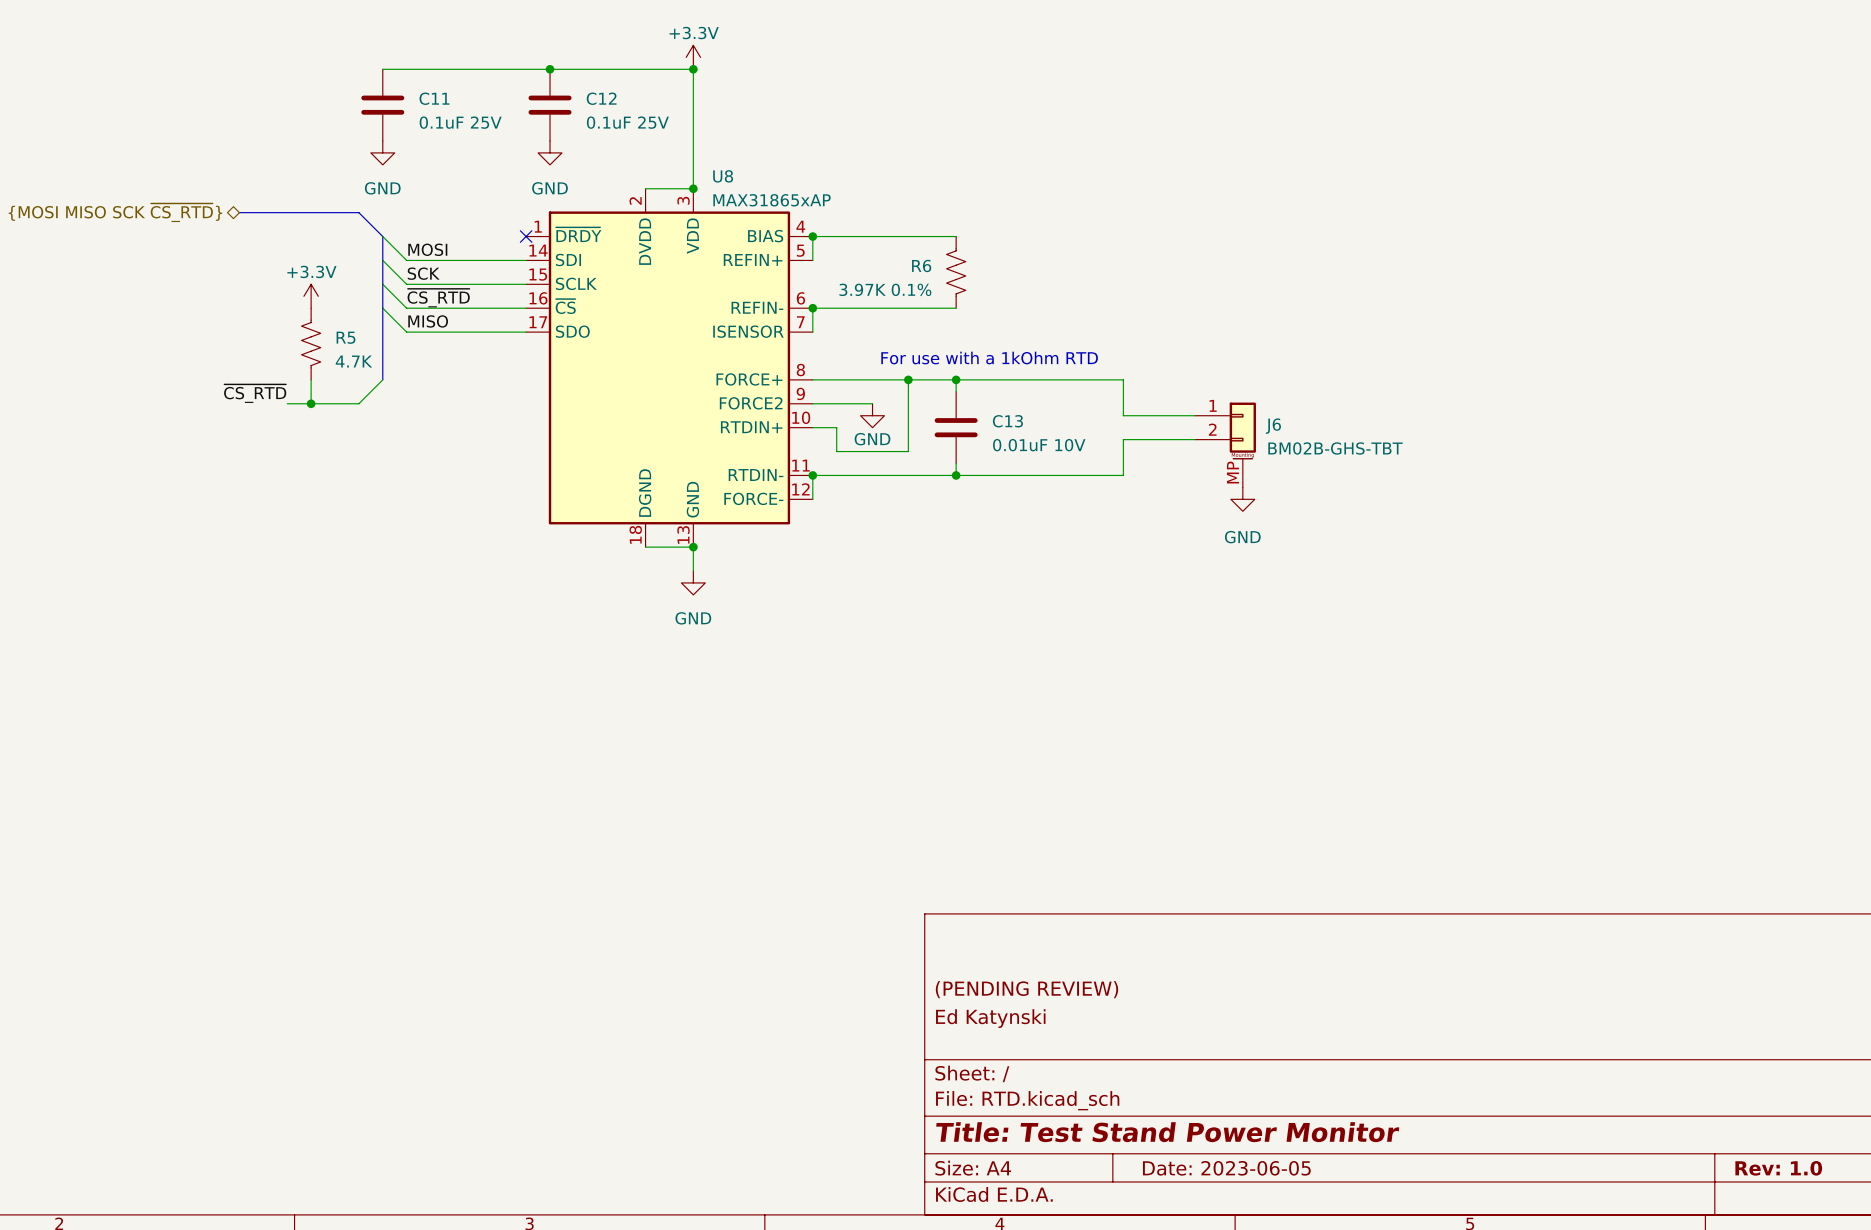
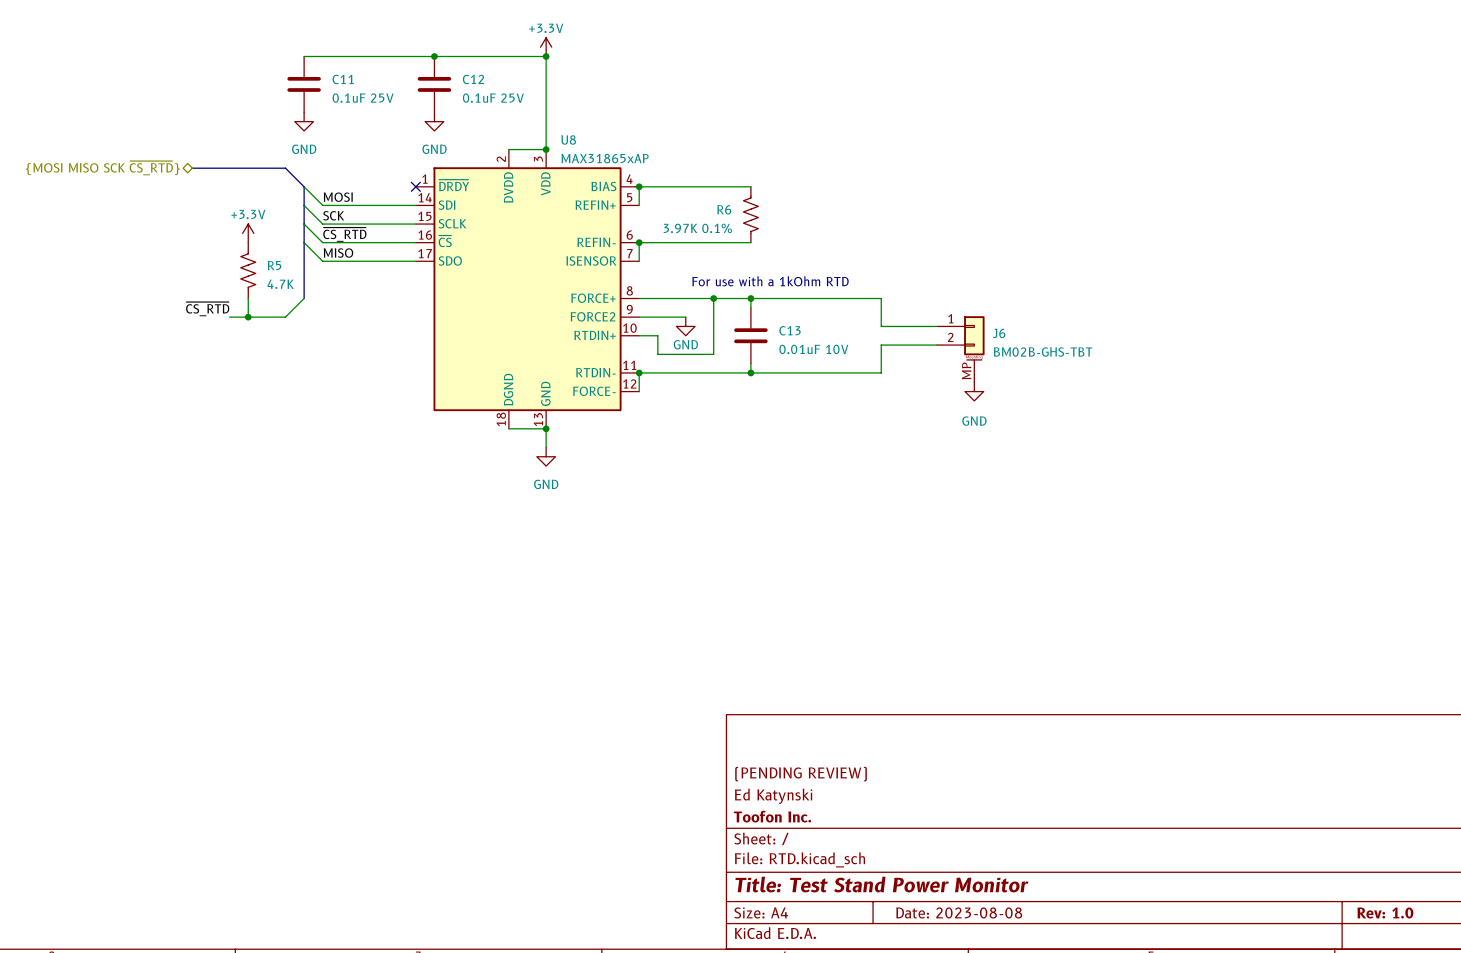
title block: none -> Toofon Inc. (772, 816)
title block: Date: 2023-06-05 (1226, 1168) -> Date: 2023-08-08 (959, 912)

